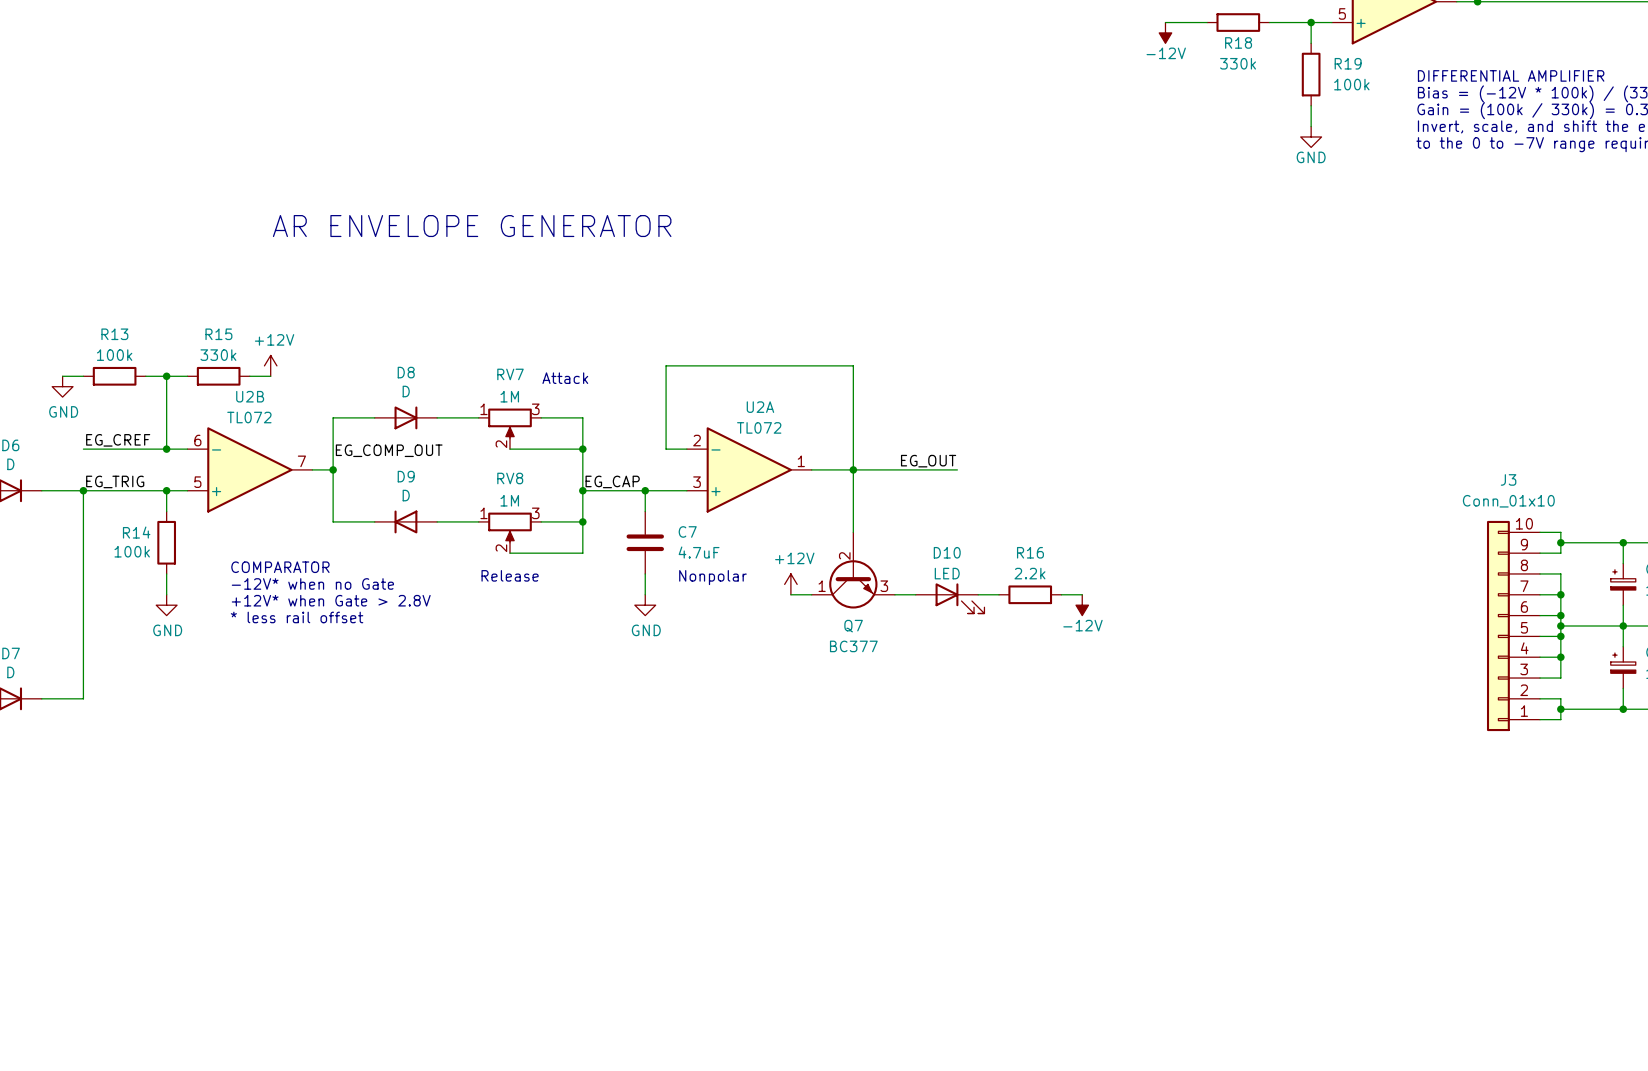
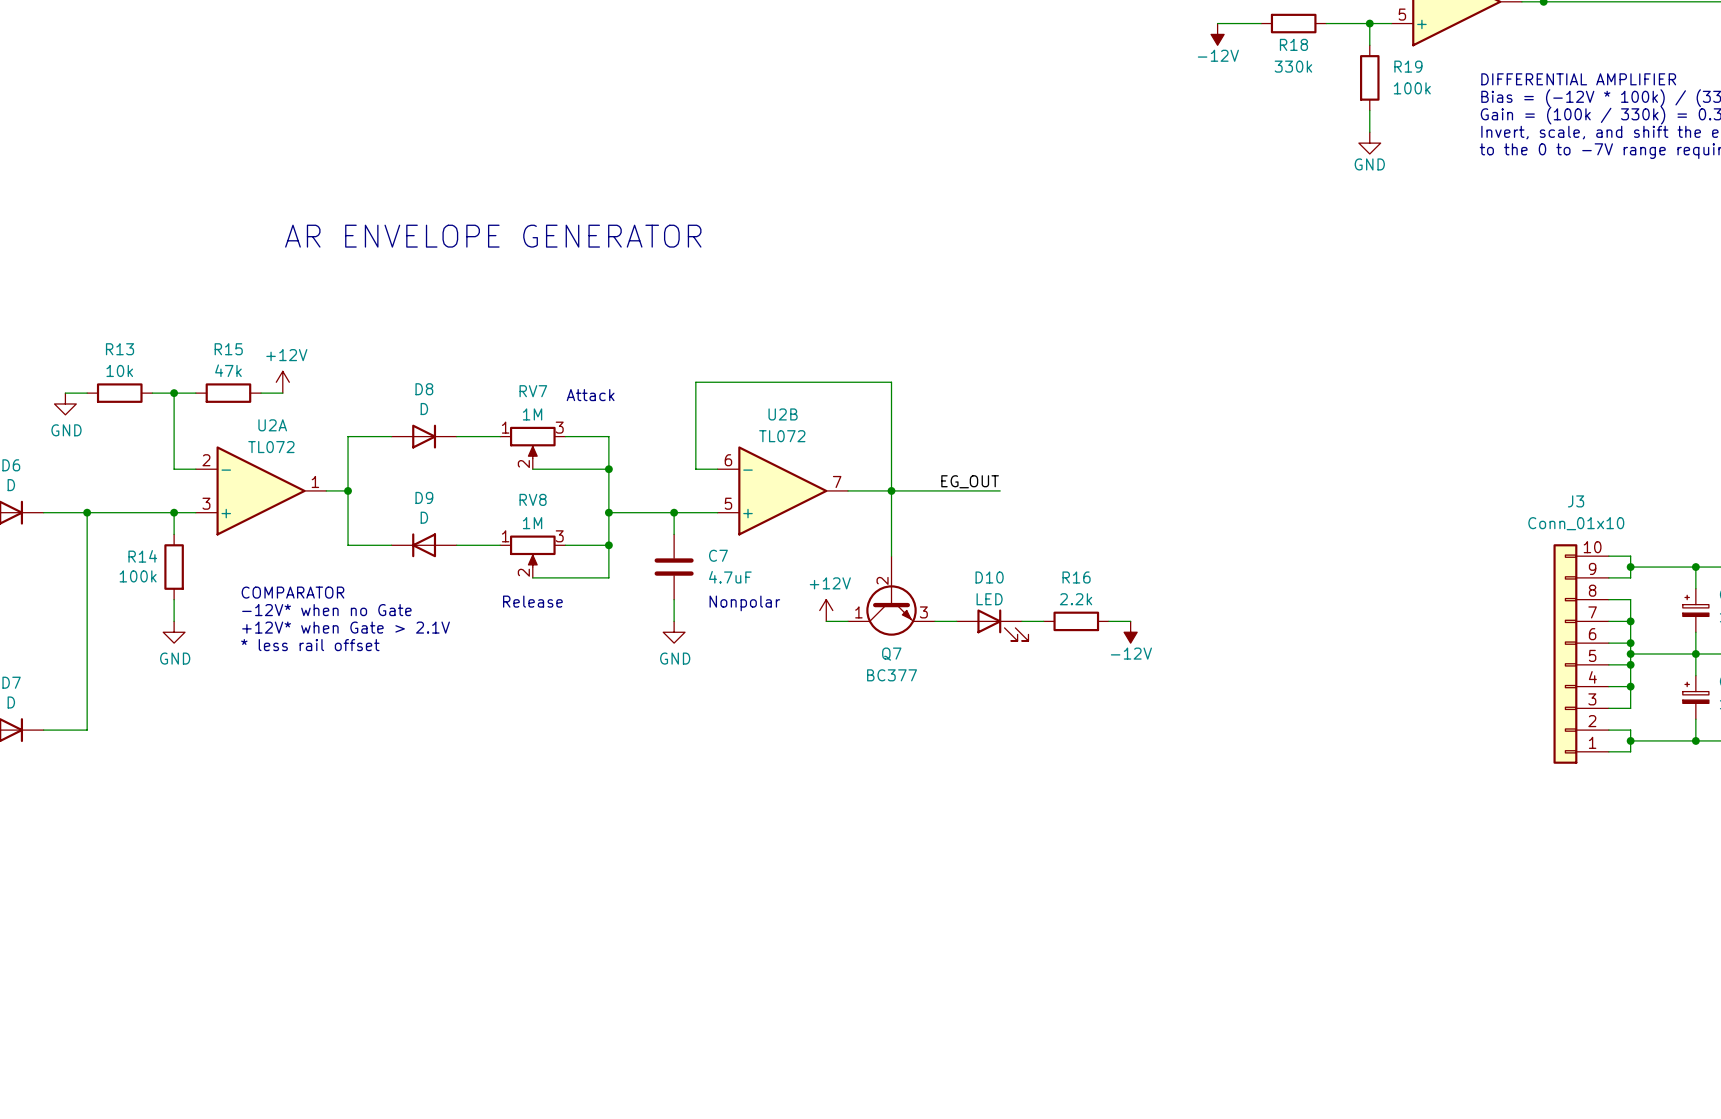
R13 value: 100k (114, 355) -> 10k (119, 370)
R15 value: 330k (218, 355) -> 47k (228, 370)
label: EG_CREF (118, 440) -> none
wire: (83, 449) (166, 449) -> none
junction: (166, 449) -> none
label: EG_COMP_OUT (389, 450) -> none
U2B position: (249, 469) -> (782, 490)
U2A position: (749, 469) -> (261, 490)
label: EG_TRIG (115, 481) -> none
label: EG_CAP (612, 481) -> none
text: +12V* when Gate > 2.8V (331, 600) -> +12V* when Gate > 2.1V (346, 627)

